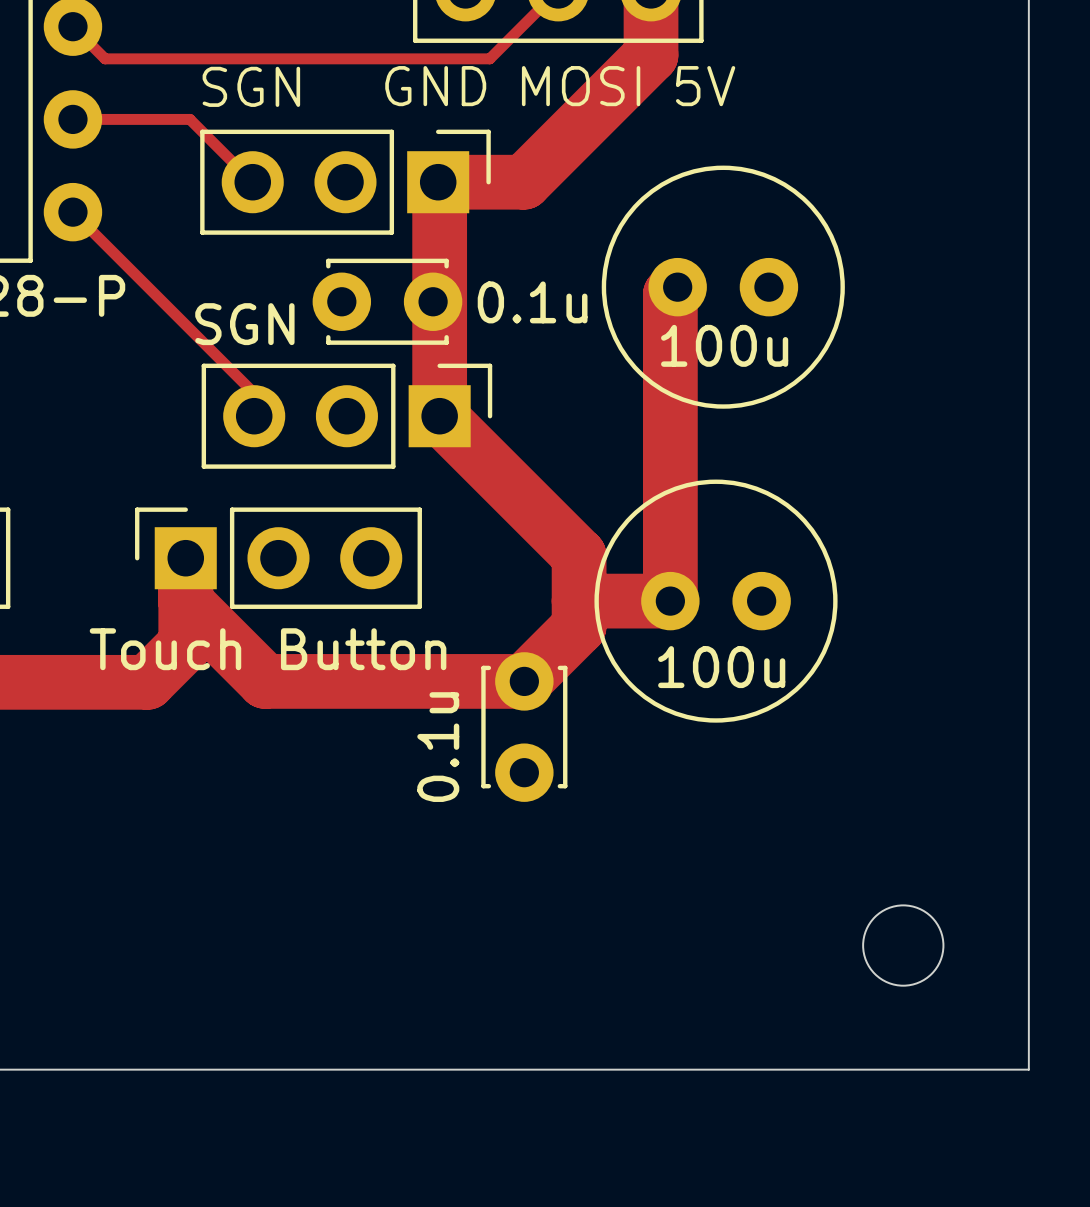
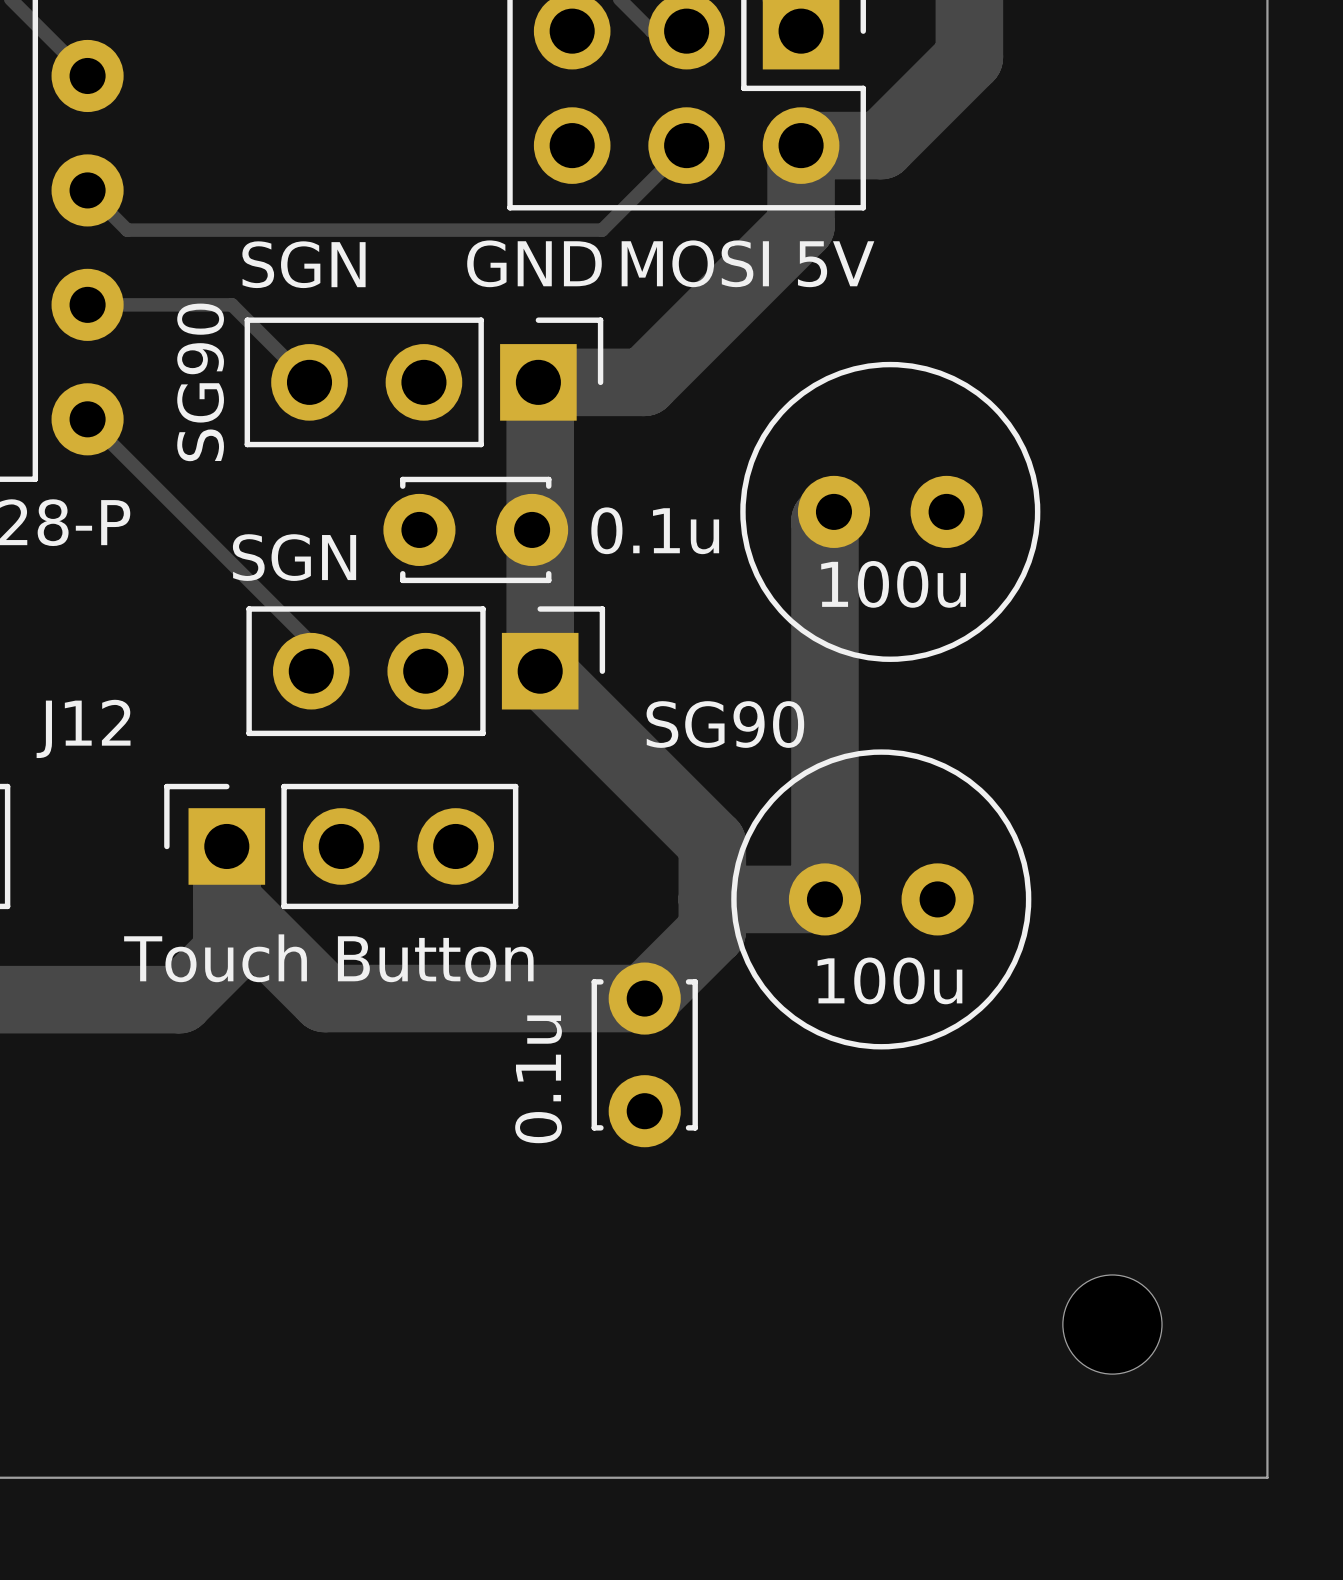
part value: none -> SG90 (200, 382)
J12 name: none -> J12 (83, 728)
part value: none -> SG90 (725, 724)

